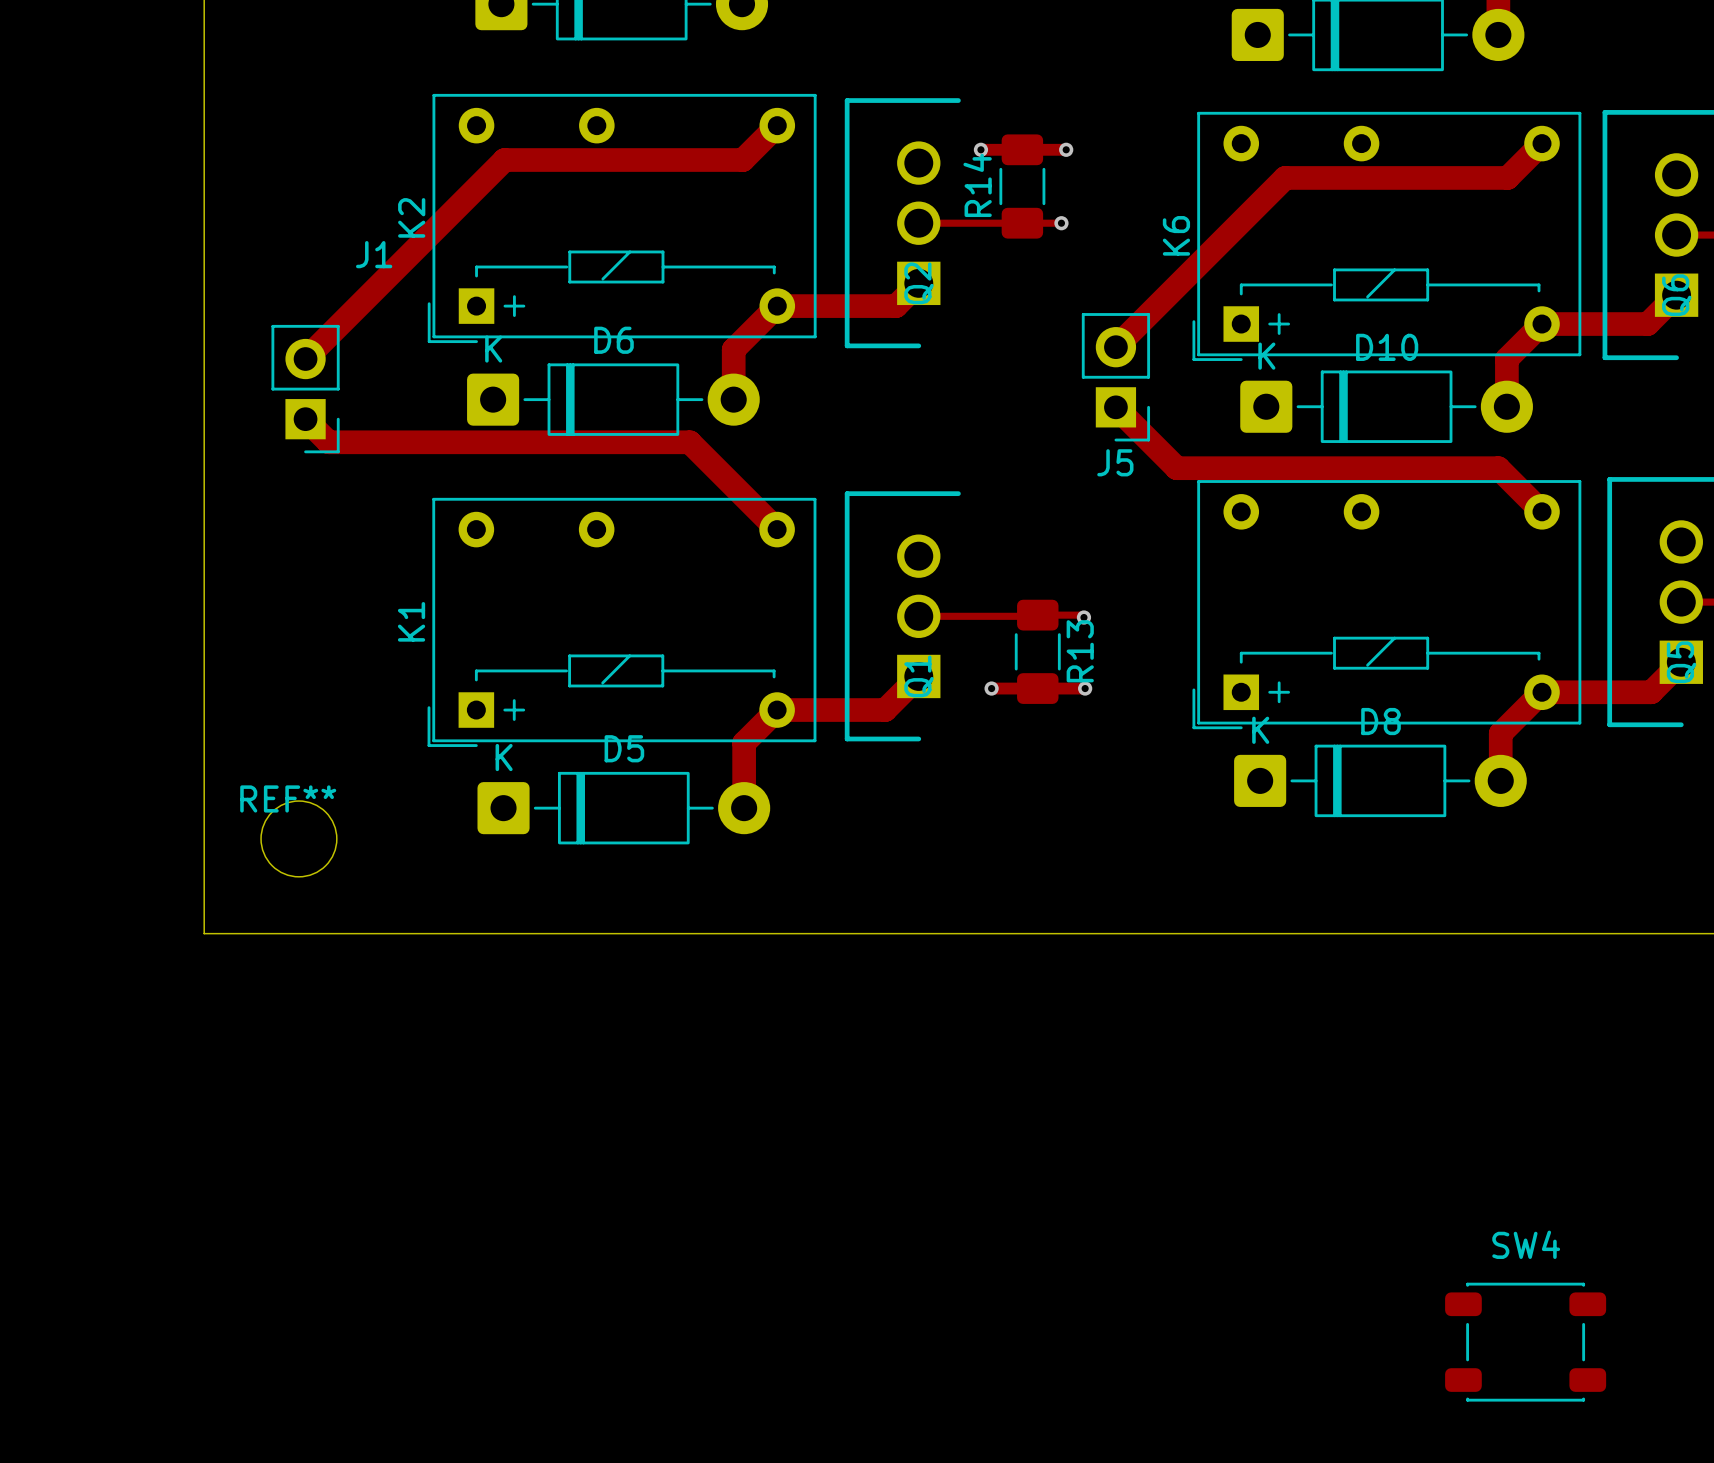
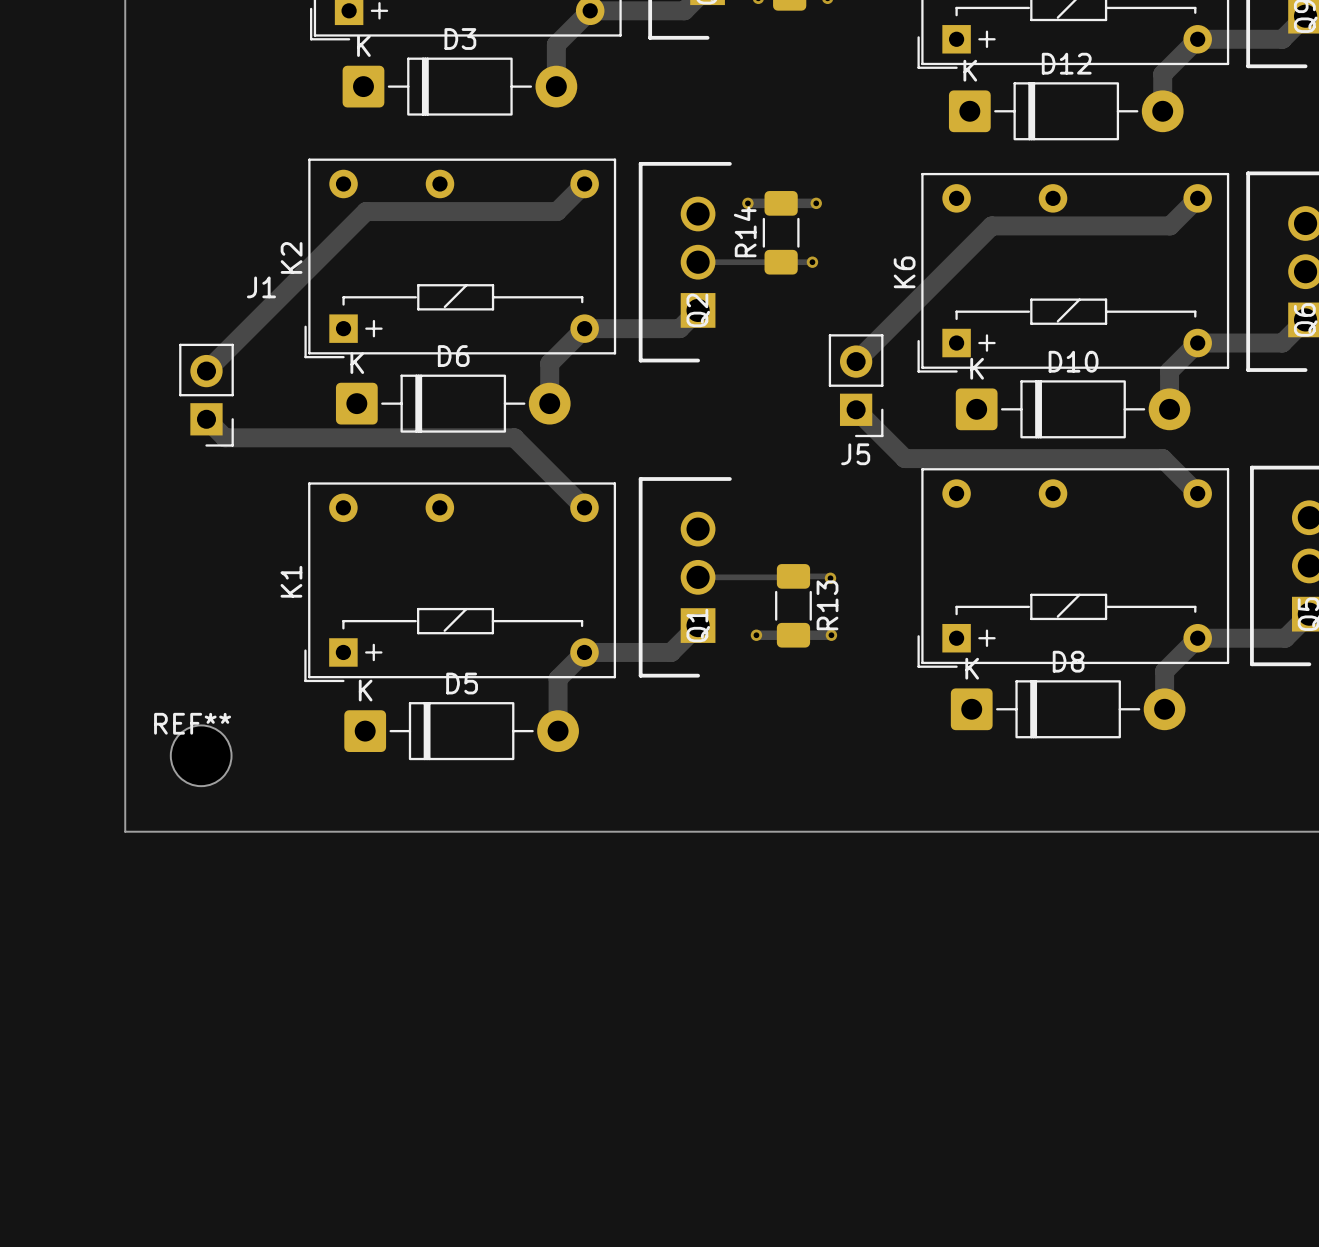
SW4: (1525, 1342) -> none

